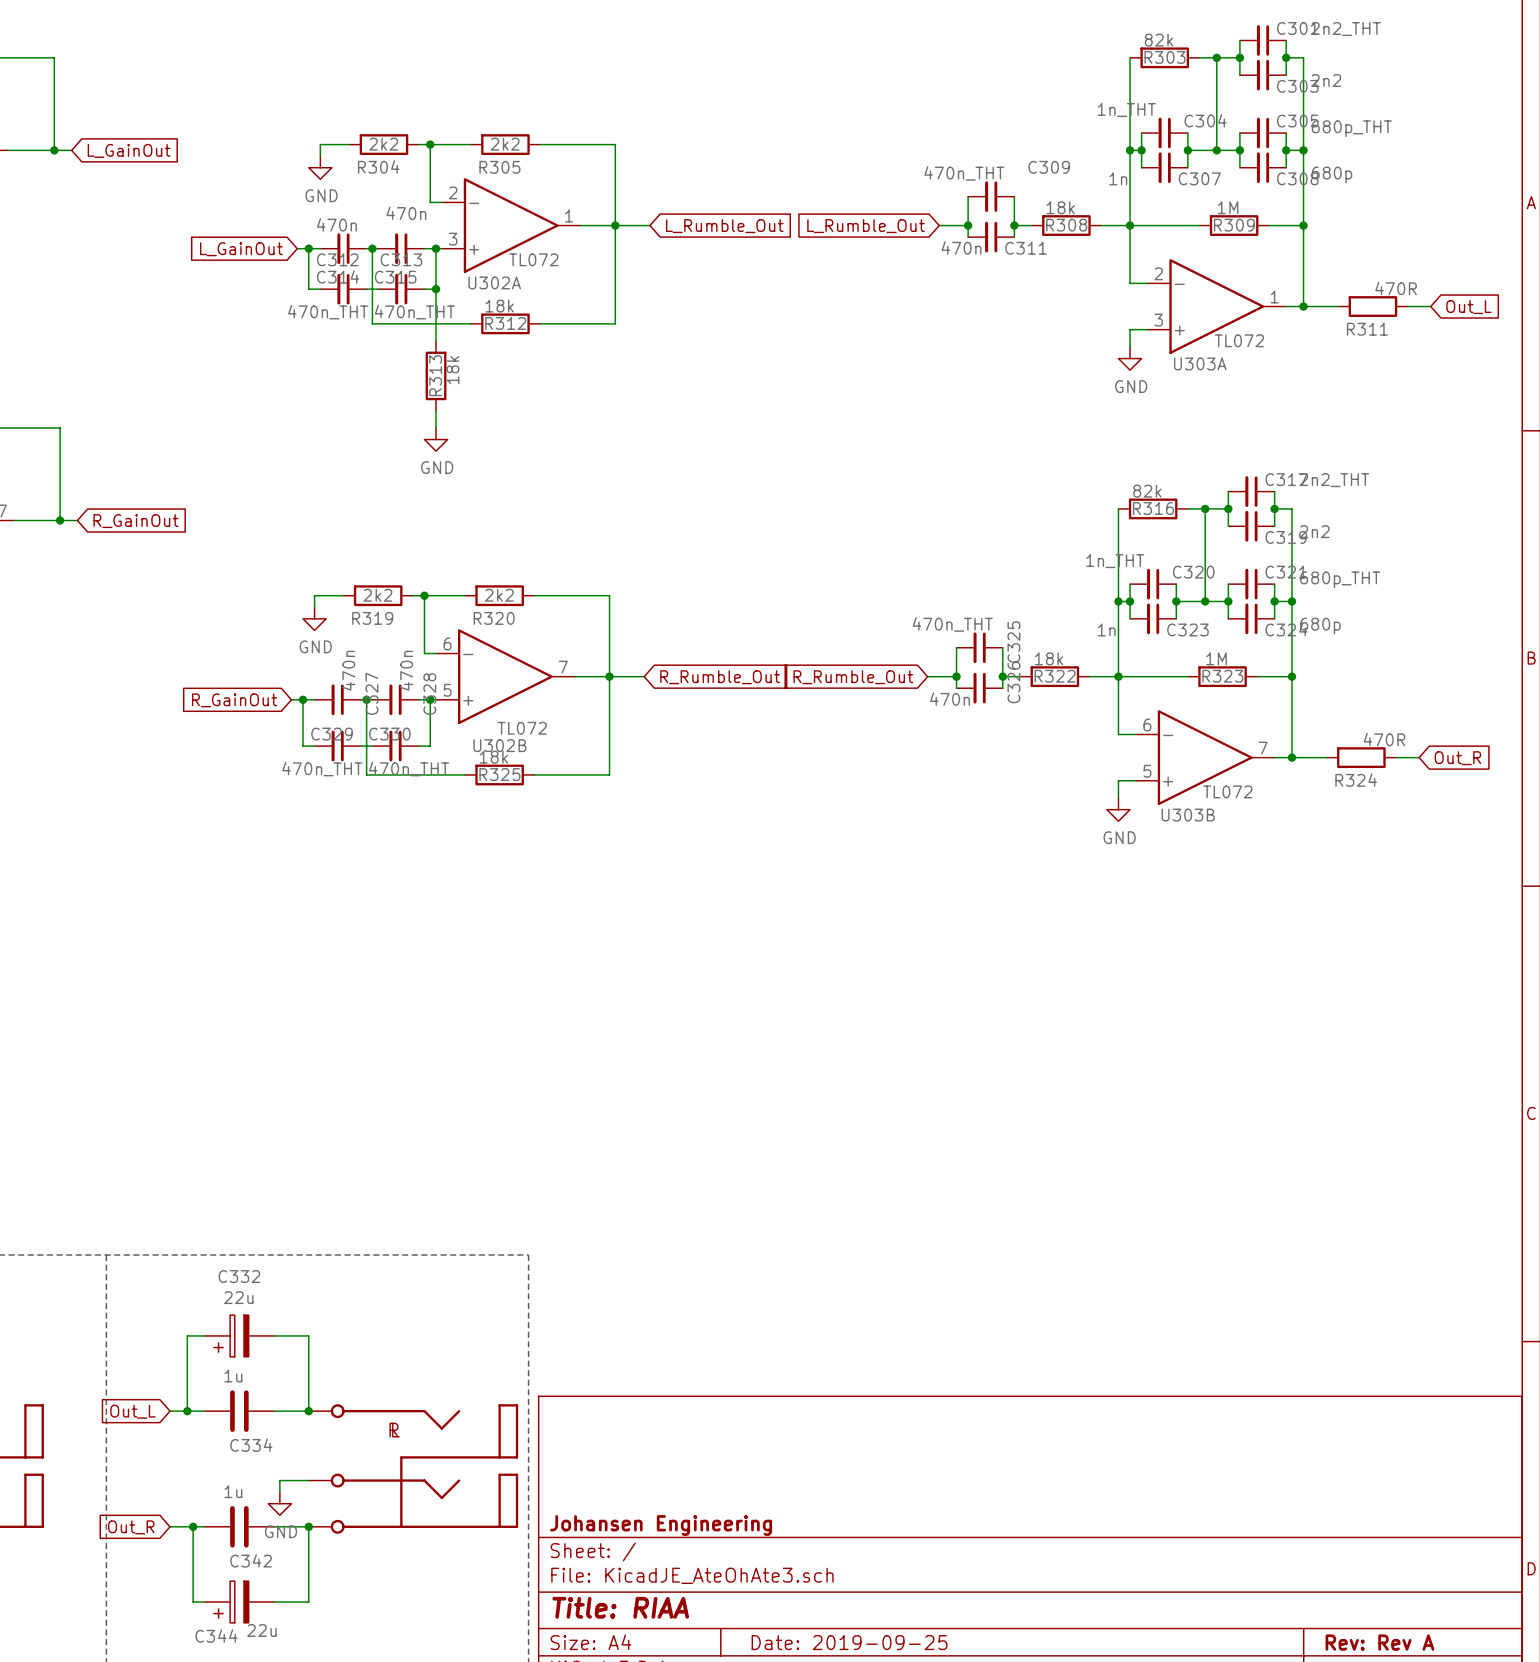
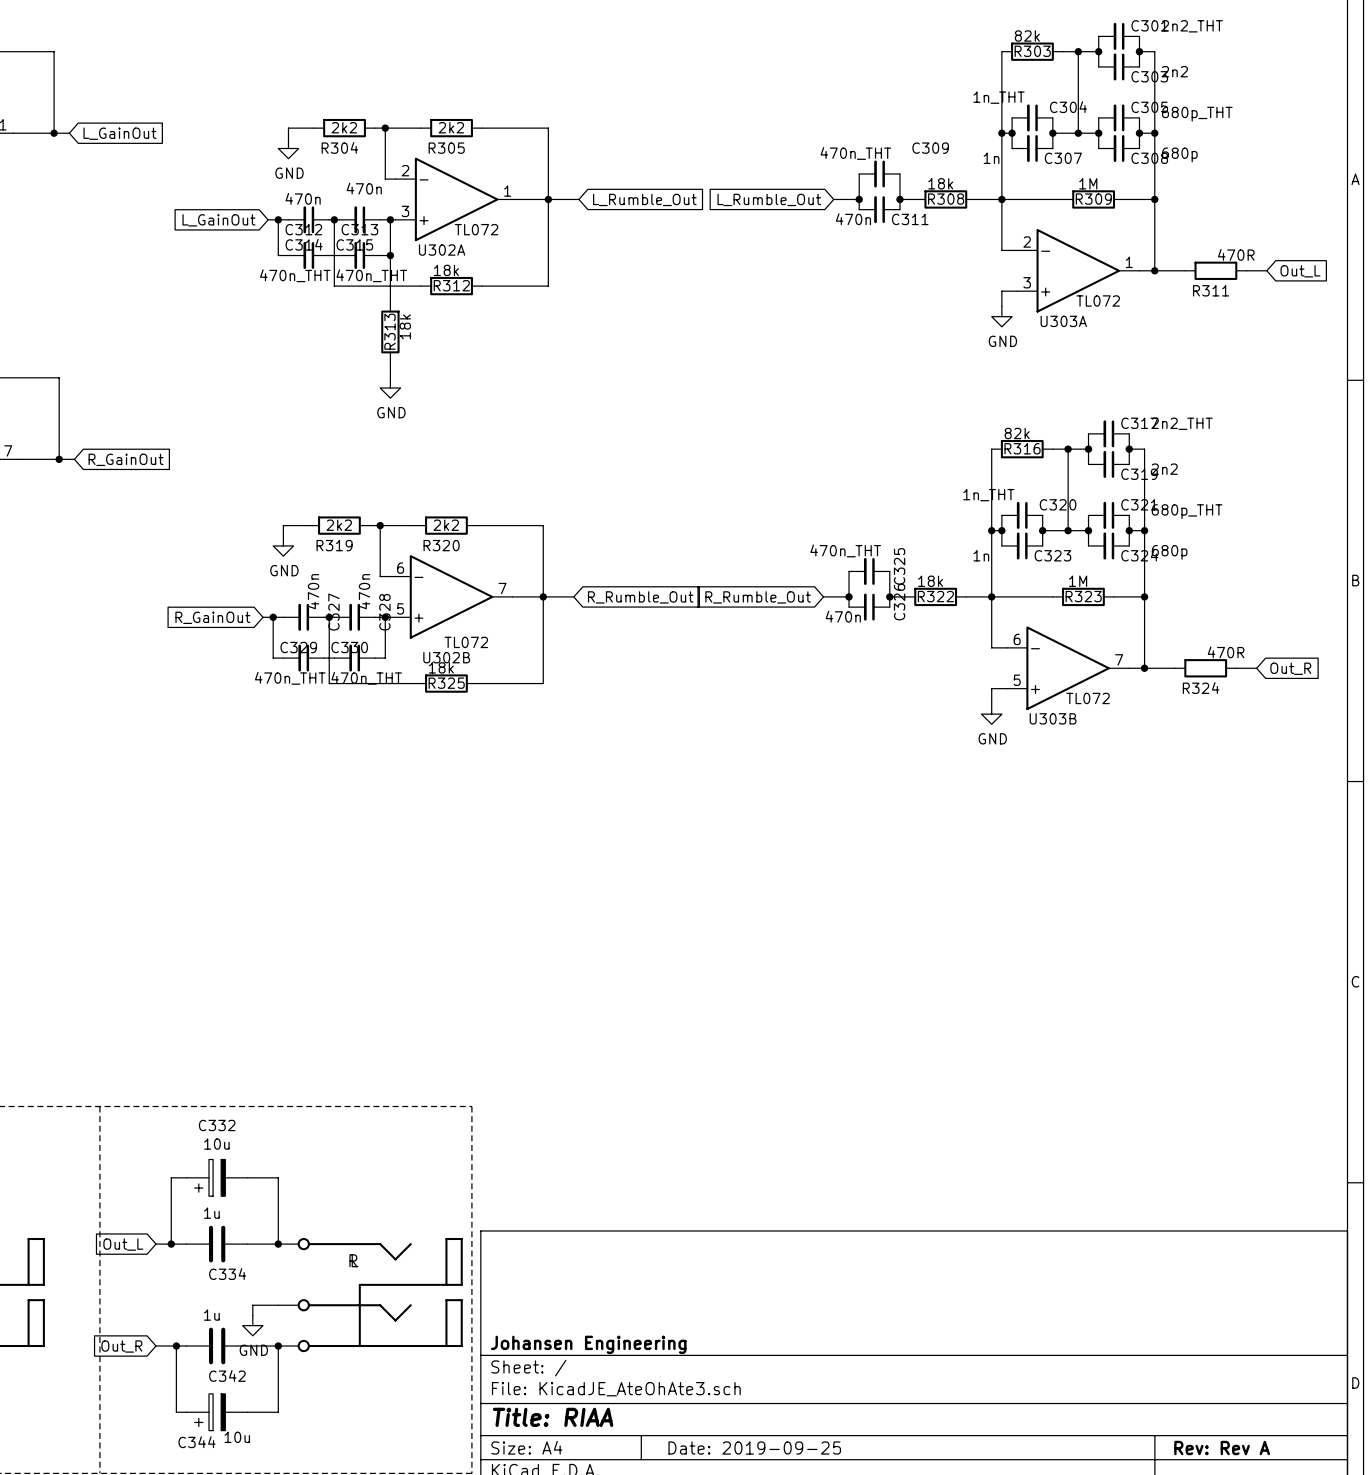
C332 value: 22u (238, 1297) -> 10u (216, 1144)
C344 value: 22u (261, 1630) -> 10u (237, 1437)

